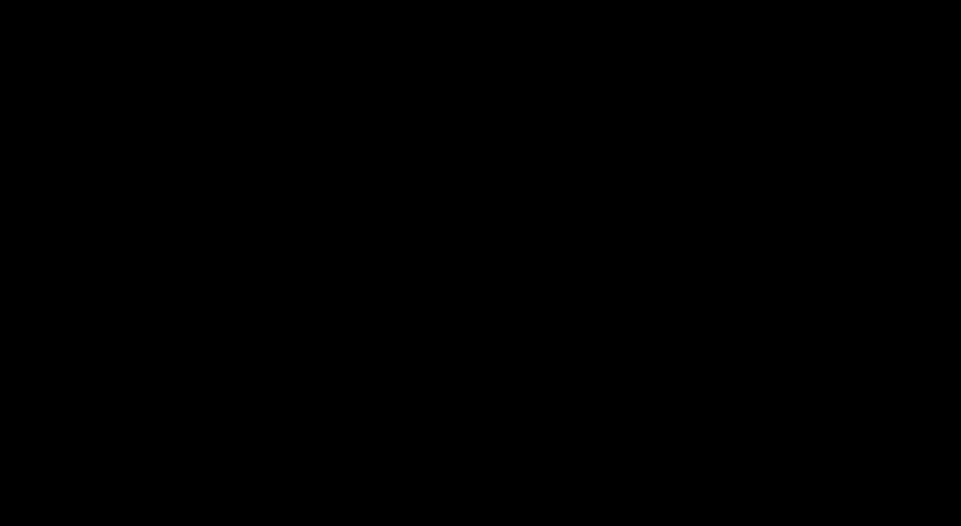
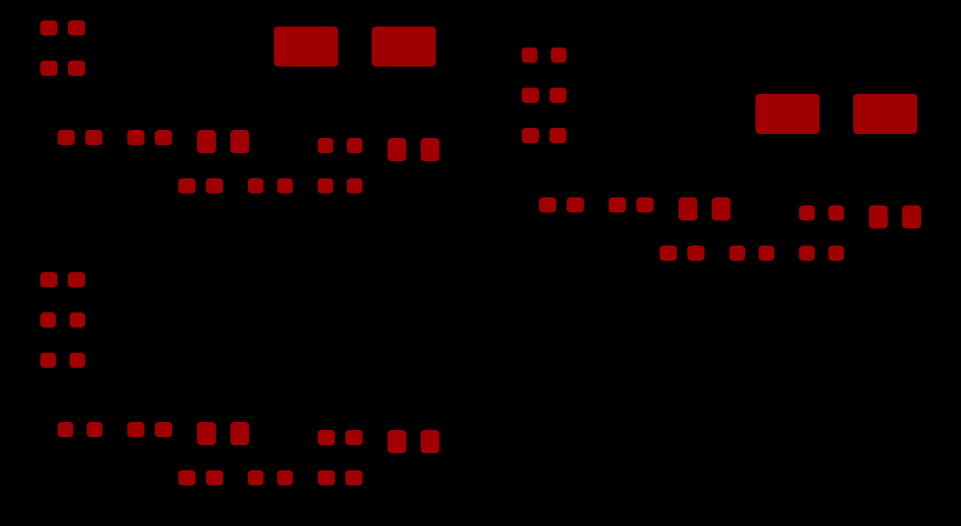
part: none -> (62, 27)
part: none -> (354, 46)
part: none -> (544, 55)
part: none -> (62, 68)
part: none -> (544, 95)
part: none -> (836, 113)
part: none -> (544, 135)
part: none -> (79, 137)
part: none -> (149, 137)
part: none -> (223, 141)
part: none -> (340, 145)
part: none -> (413, 149)
part: none -> (200, 185)
part: none -> (270, 185)
part: none -> (340, 185)
part: none -> (561, 204)
part: none -> (631, 204)
part: none -> (704, 208)
part: none -> (821, 212)
part: none -> (894, 216)
part: none -> (682, 253)
part: none -> (751, 253)
part: none -> (821, 253)
part: none -> (62, 279)
part: none -> (62, 319)
part: none -> (62, 360)
part: none -> (79, 429)
part: none -> (149, 429)
part: none -> (223, 433)
part: none -> (340, 437)
part: none -> (413, 441)
part: none -> (200, 477)
part: none -> (270, 477)
part: none -> (340, 477)

